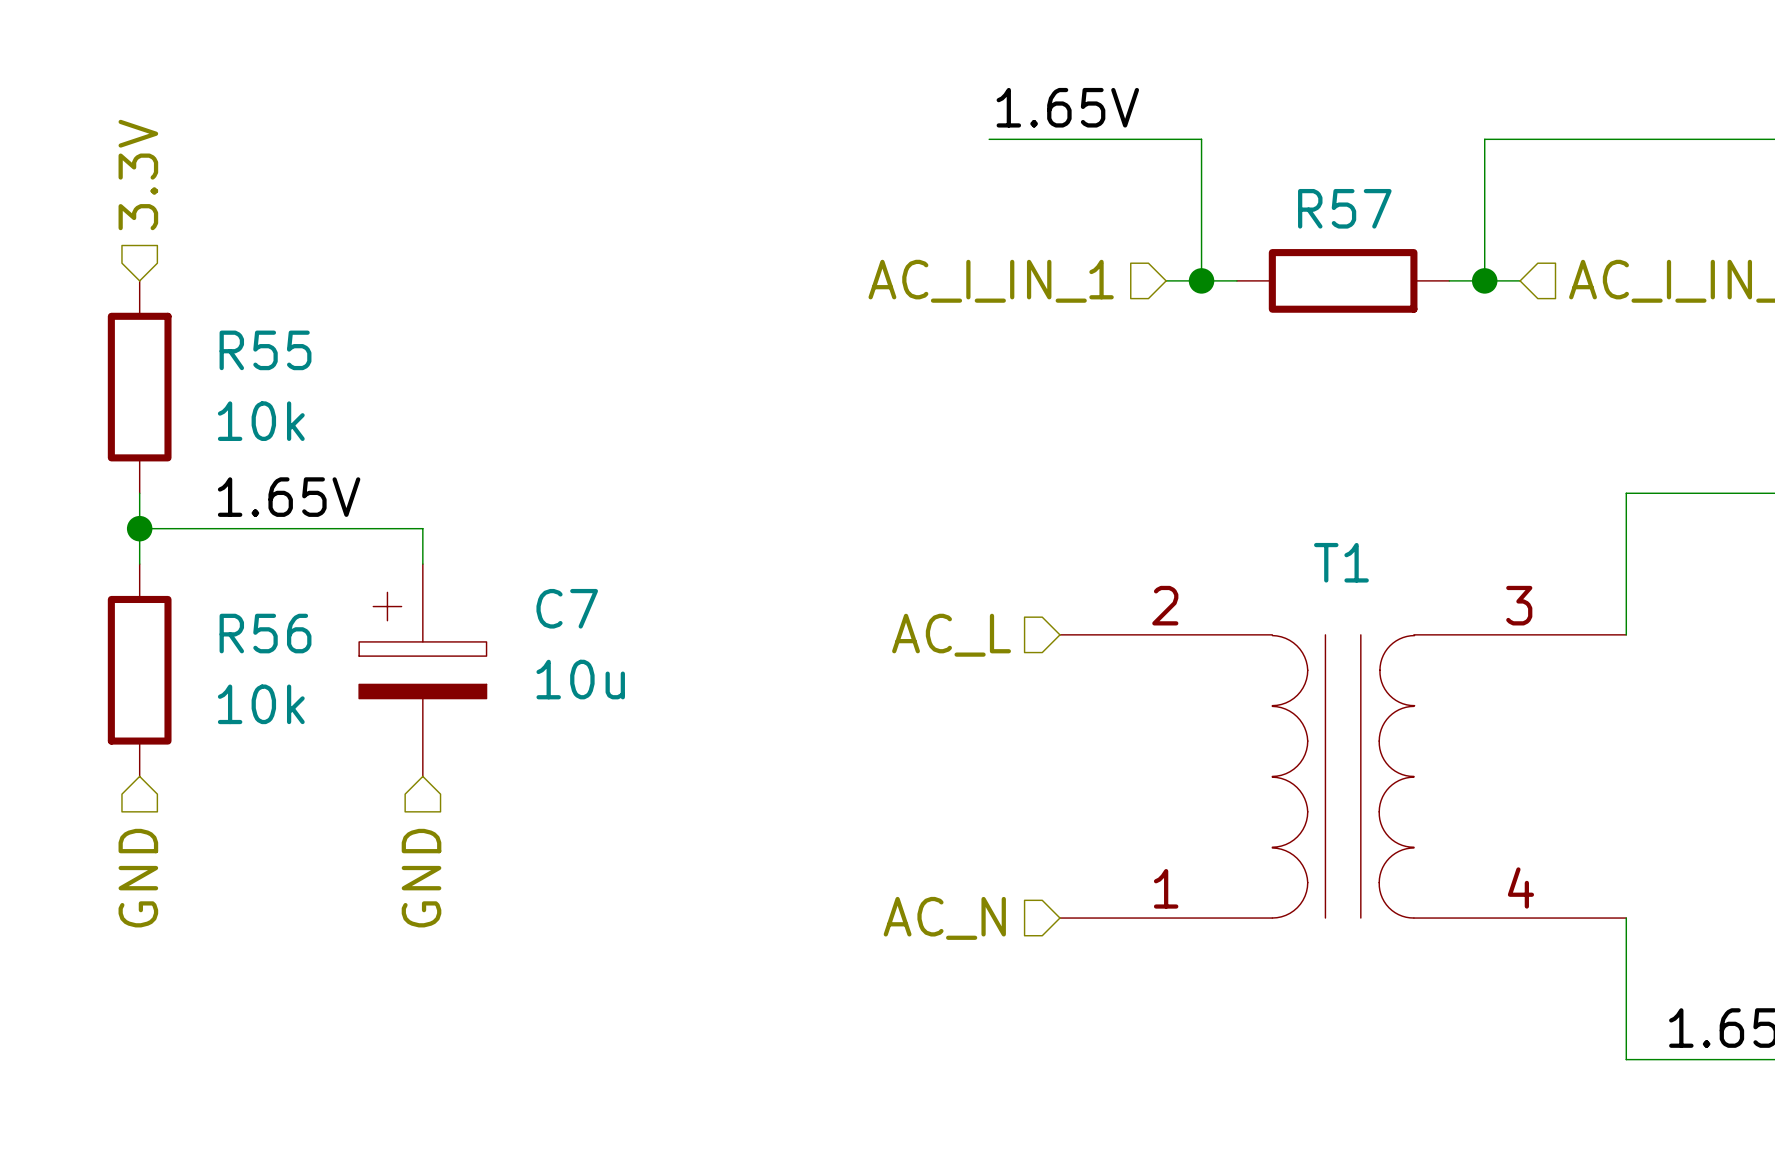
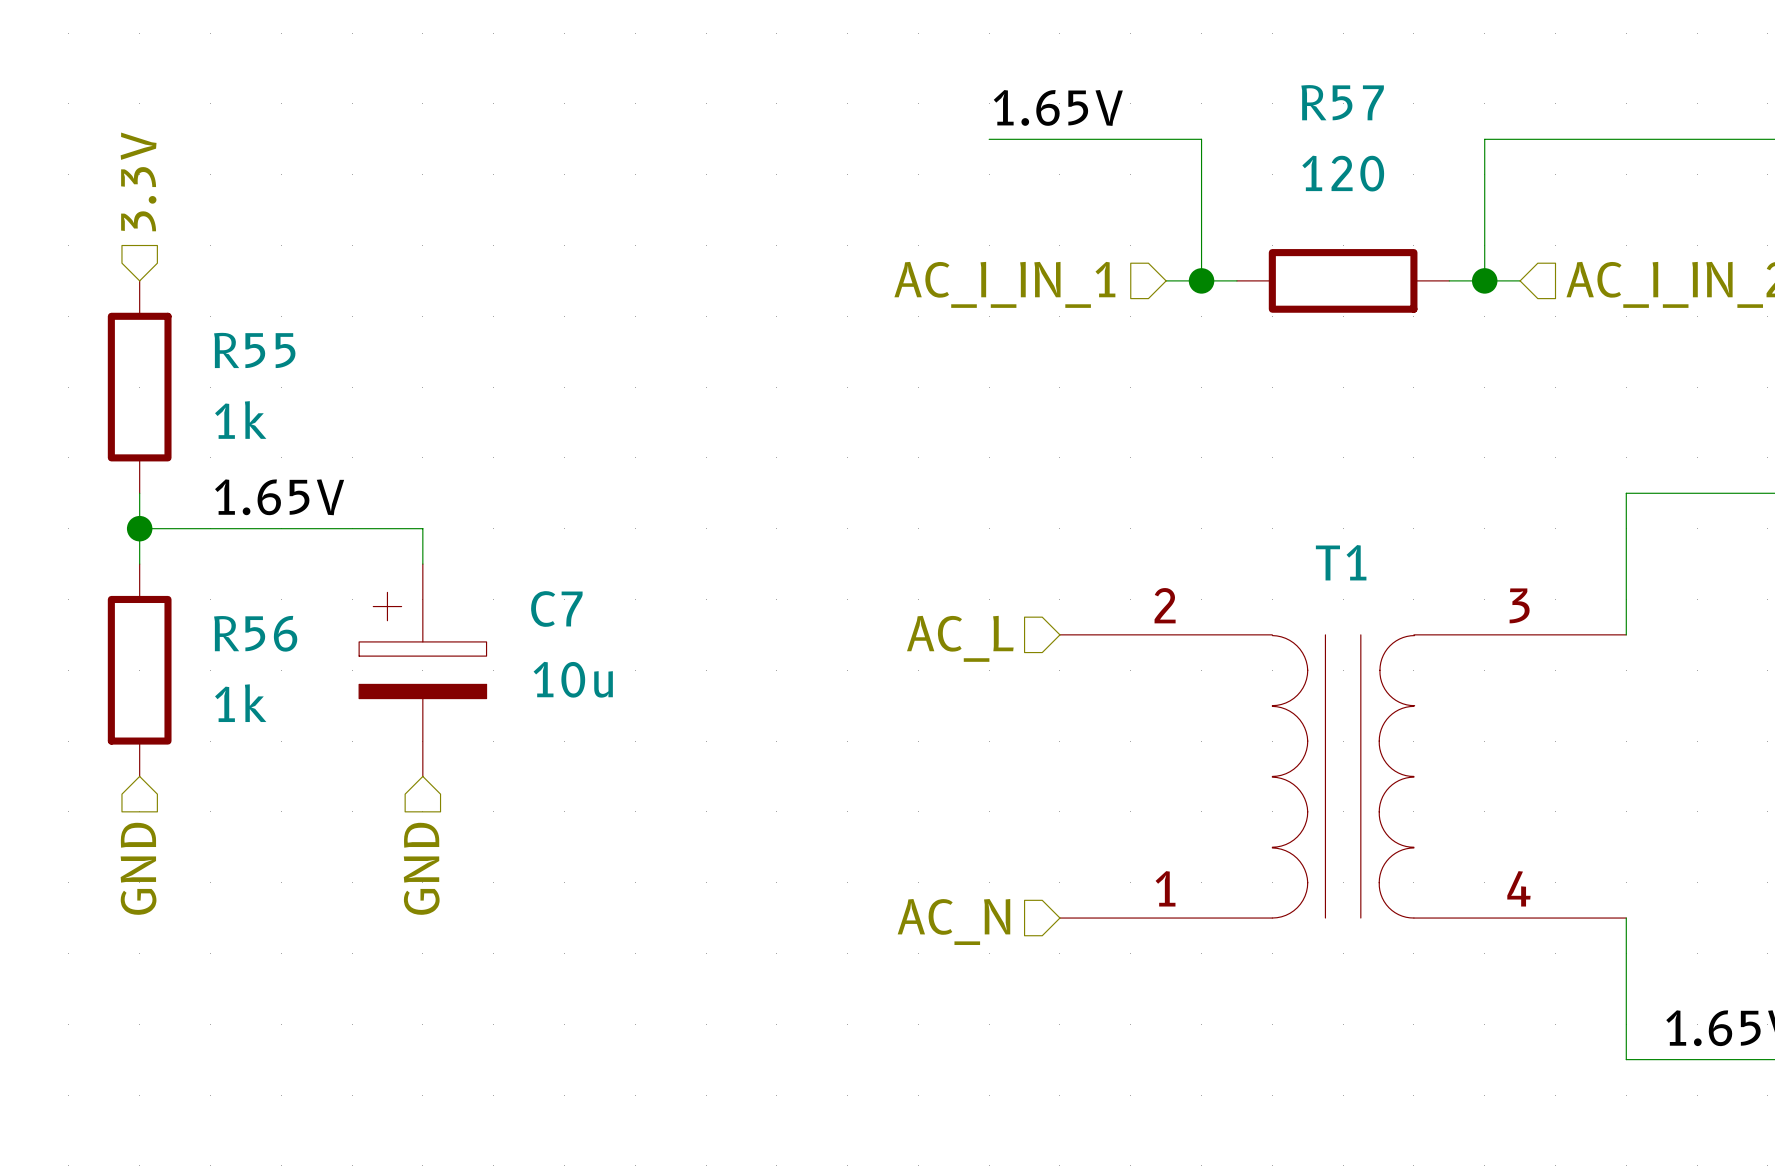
R57 value: none -> 120 (1343, 173)
R57 name position: R57 (1344, 208) -> R57 (1342, 102)
R55 value: 10k (261, 421) -> 1k (240, 420)
R56 value: 10k (261, 704) -> 1k (240, 703)

